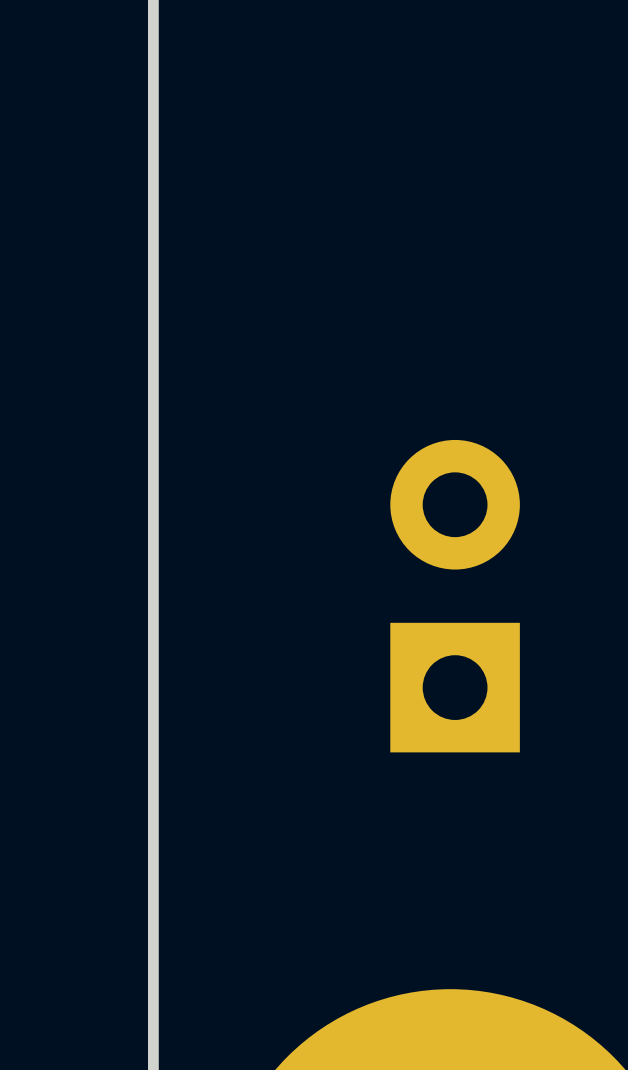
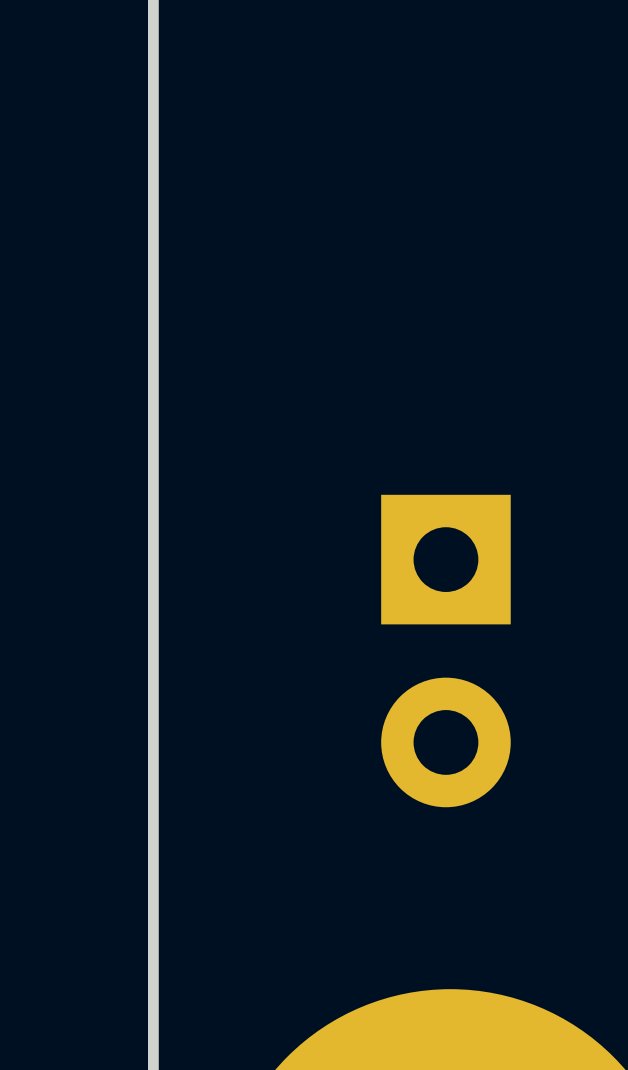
part rotation: 0° (455, 596) -> 180° (445, 651)

